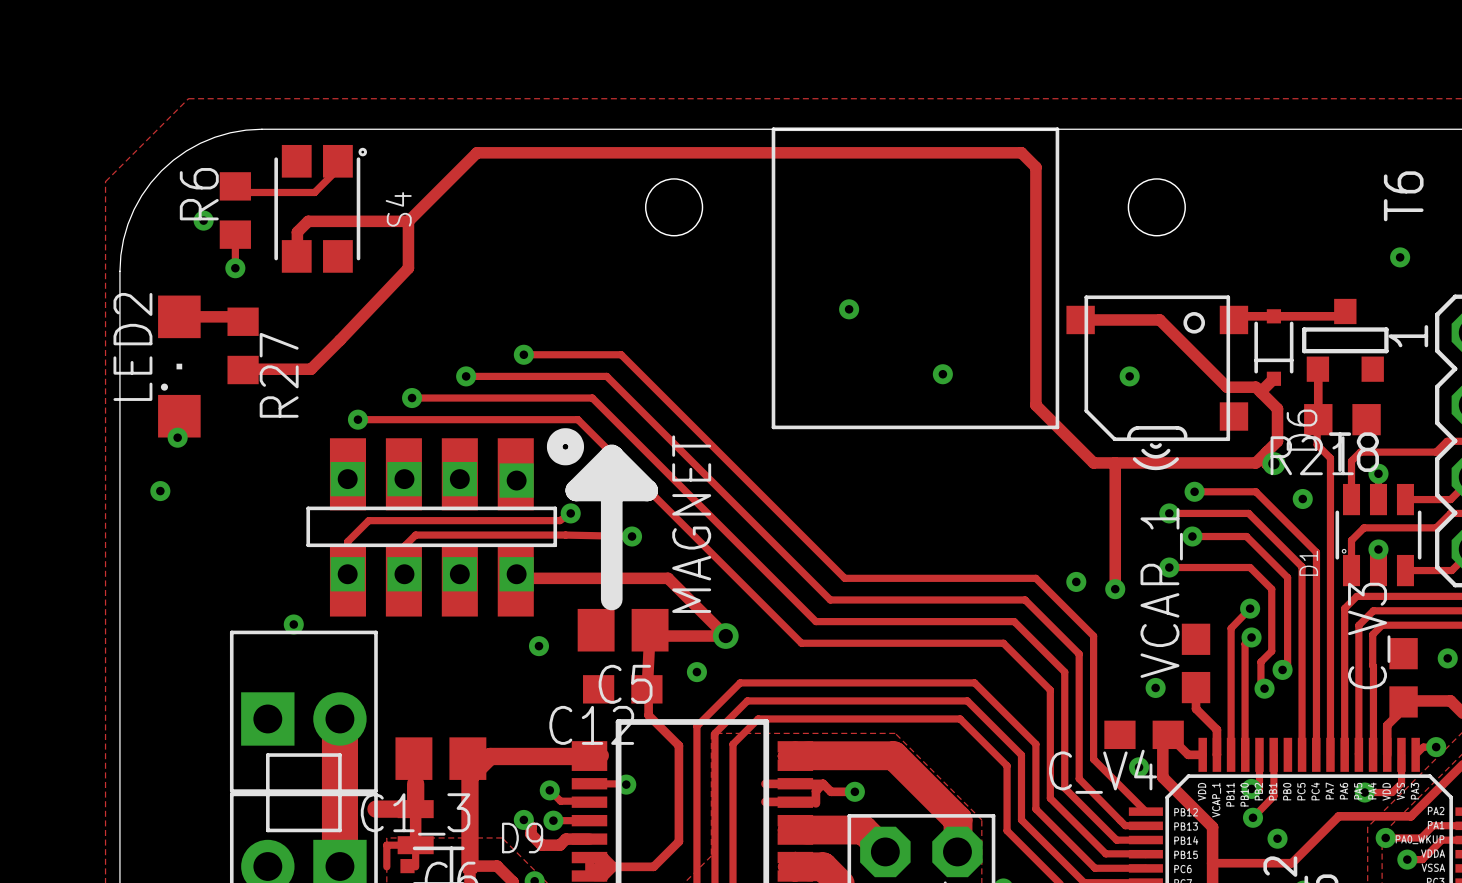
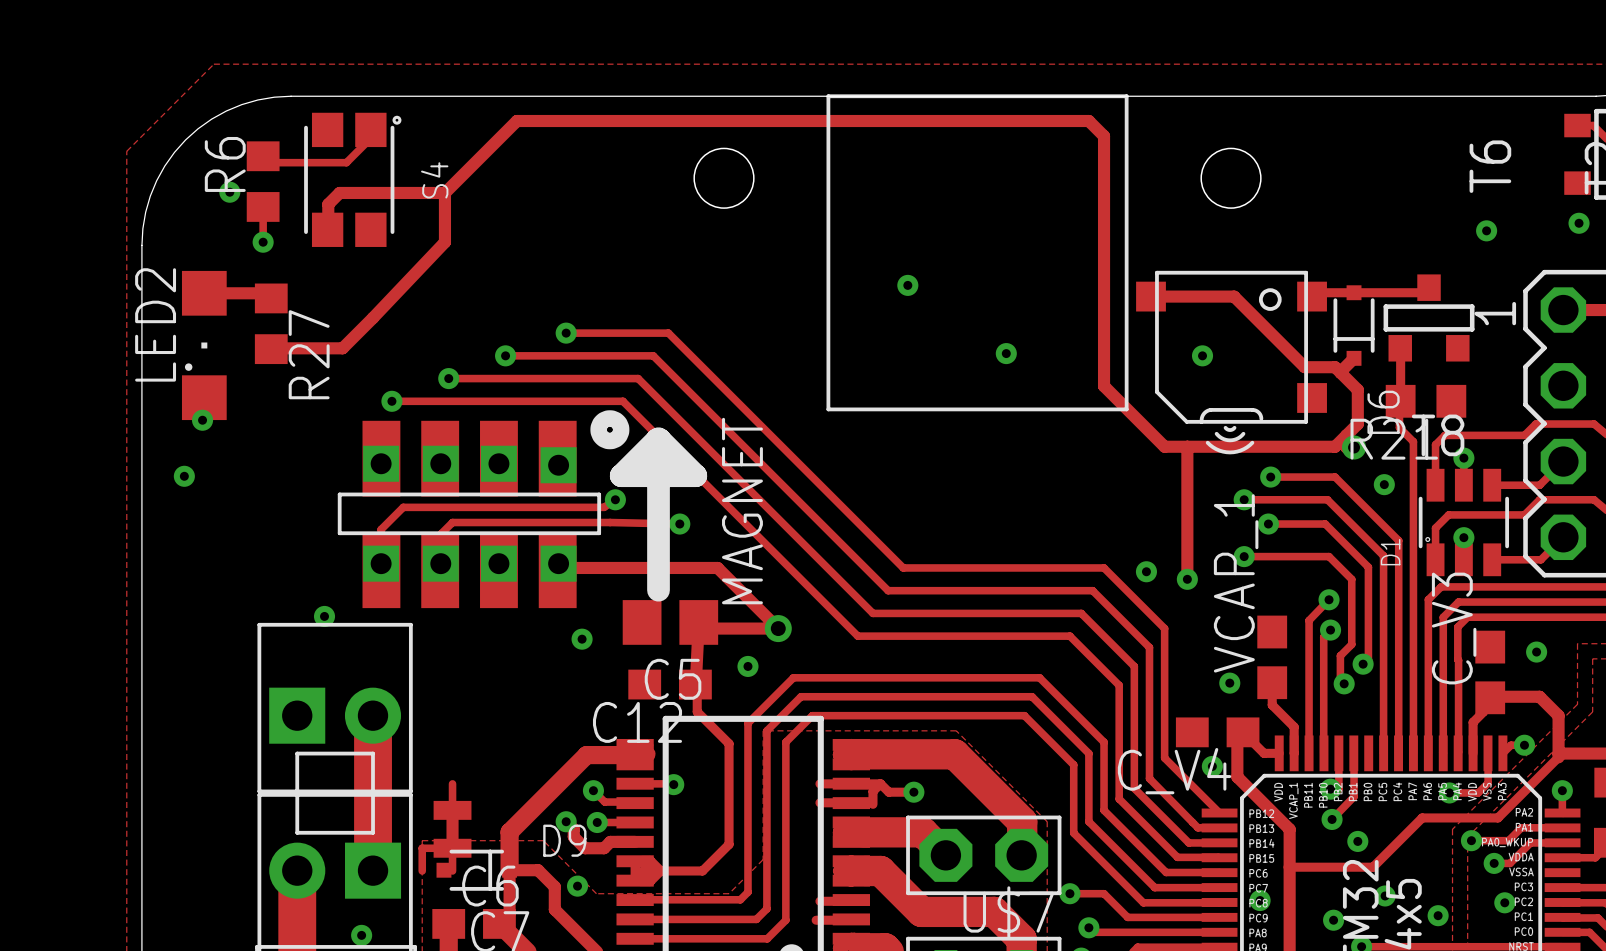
track: (543, 756) (490, 756) (469, 776) -> (586, 755) (509, 832)
C1_3: (440, 758) -> none
track: (467, 763) (467, 758) (469, 764) (469, 829) -> none
track width: thick (415, 783) (415, 809) -> thin (452, 783) (452, 810)
track: (375, 809) (415, 809) -> none

